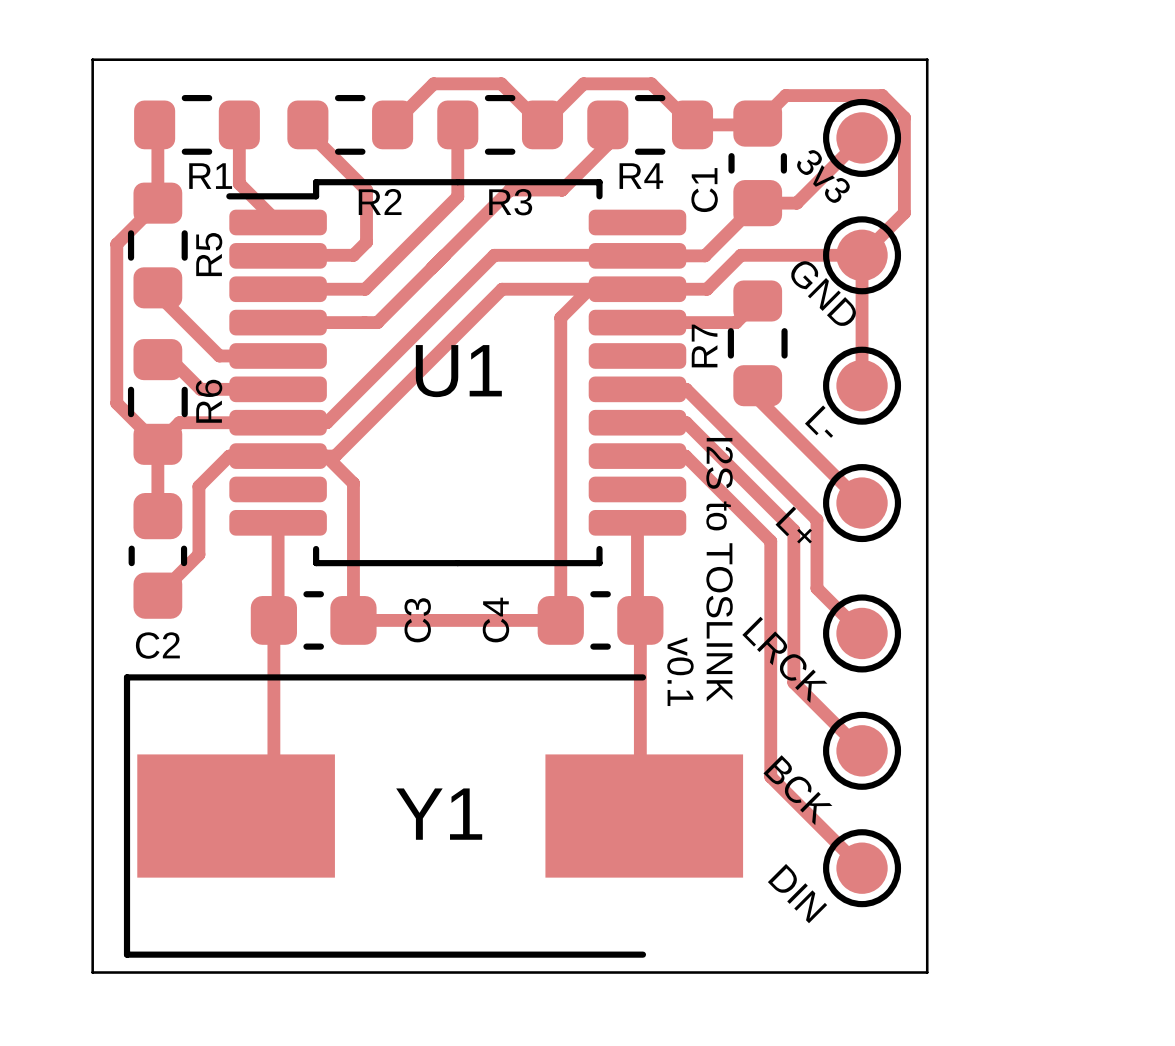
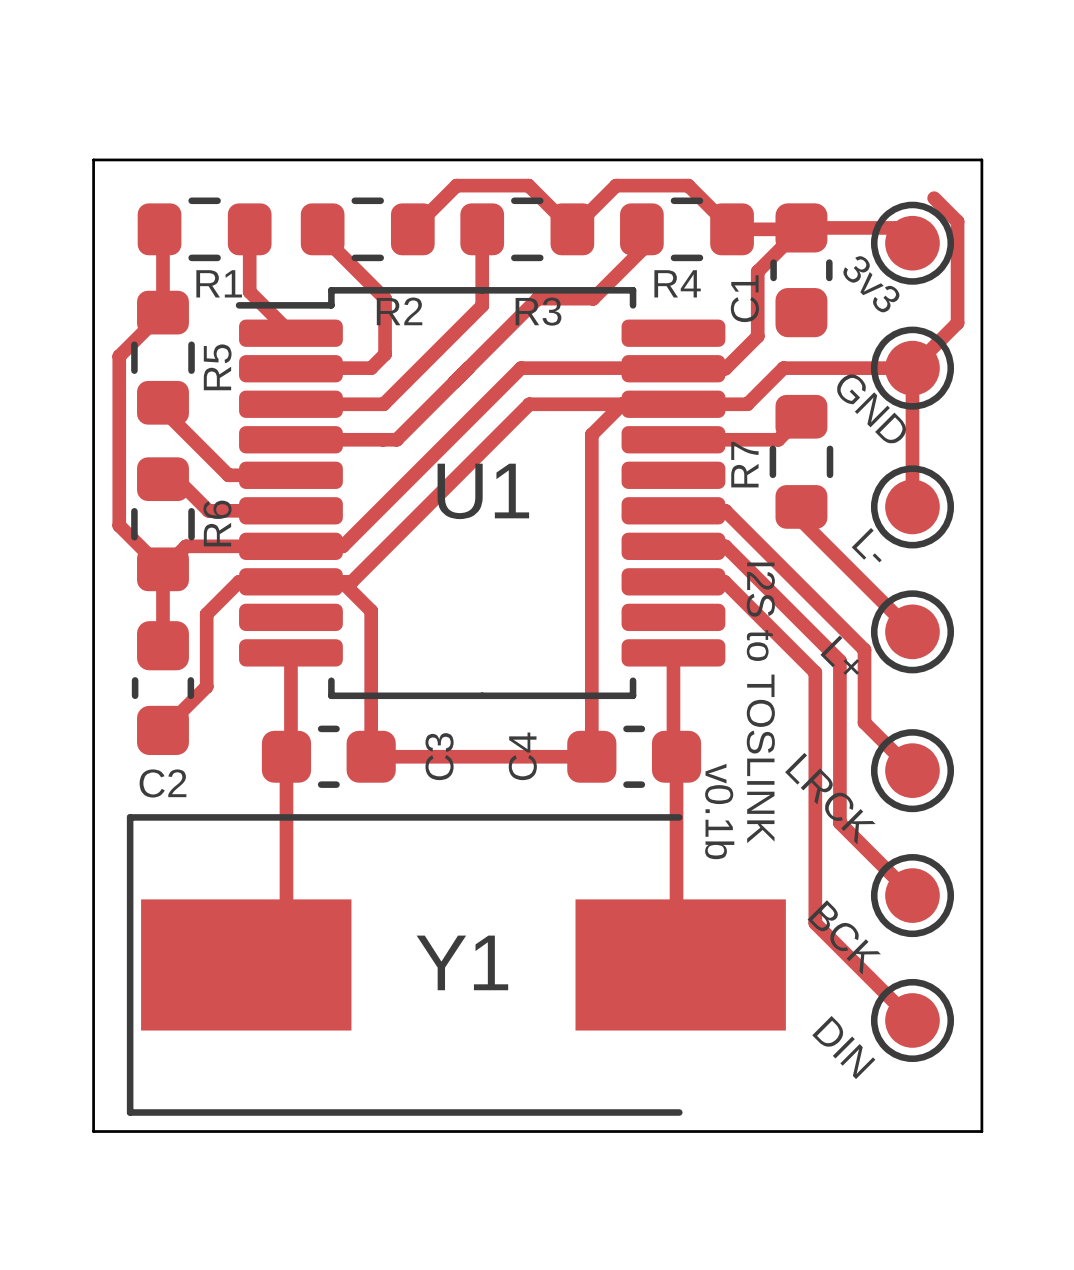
track: (882, 95) (785, 95) (757, 123) -> (912, 243) (897, 227) (801, 227)
track: (862, 137) (796, 203) (757, 203) (704, 255) (686, 255) -> (800, 229) (757, 271) (757, 336) (725, 368)
text: v0.1 (680, 671) -> v0.1b (719, 811)

